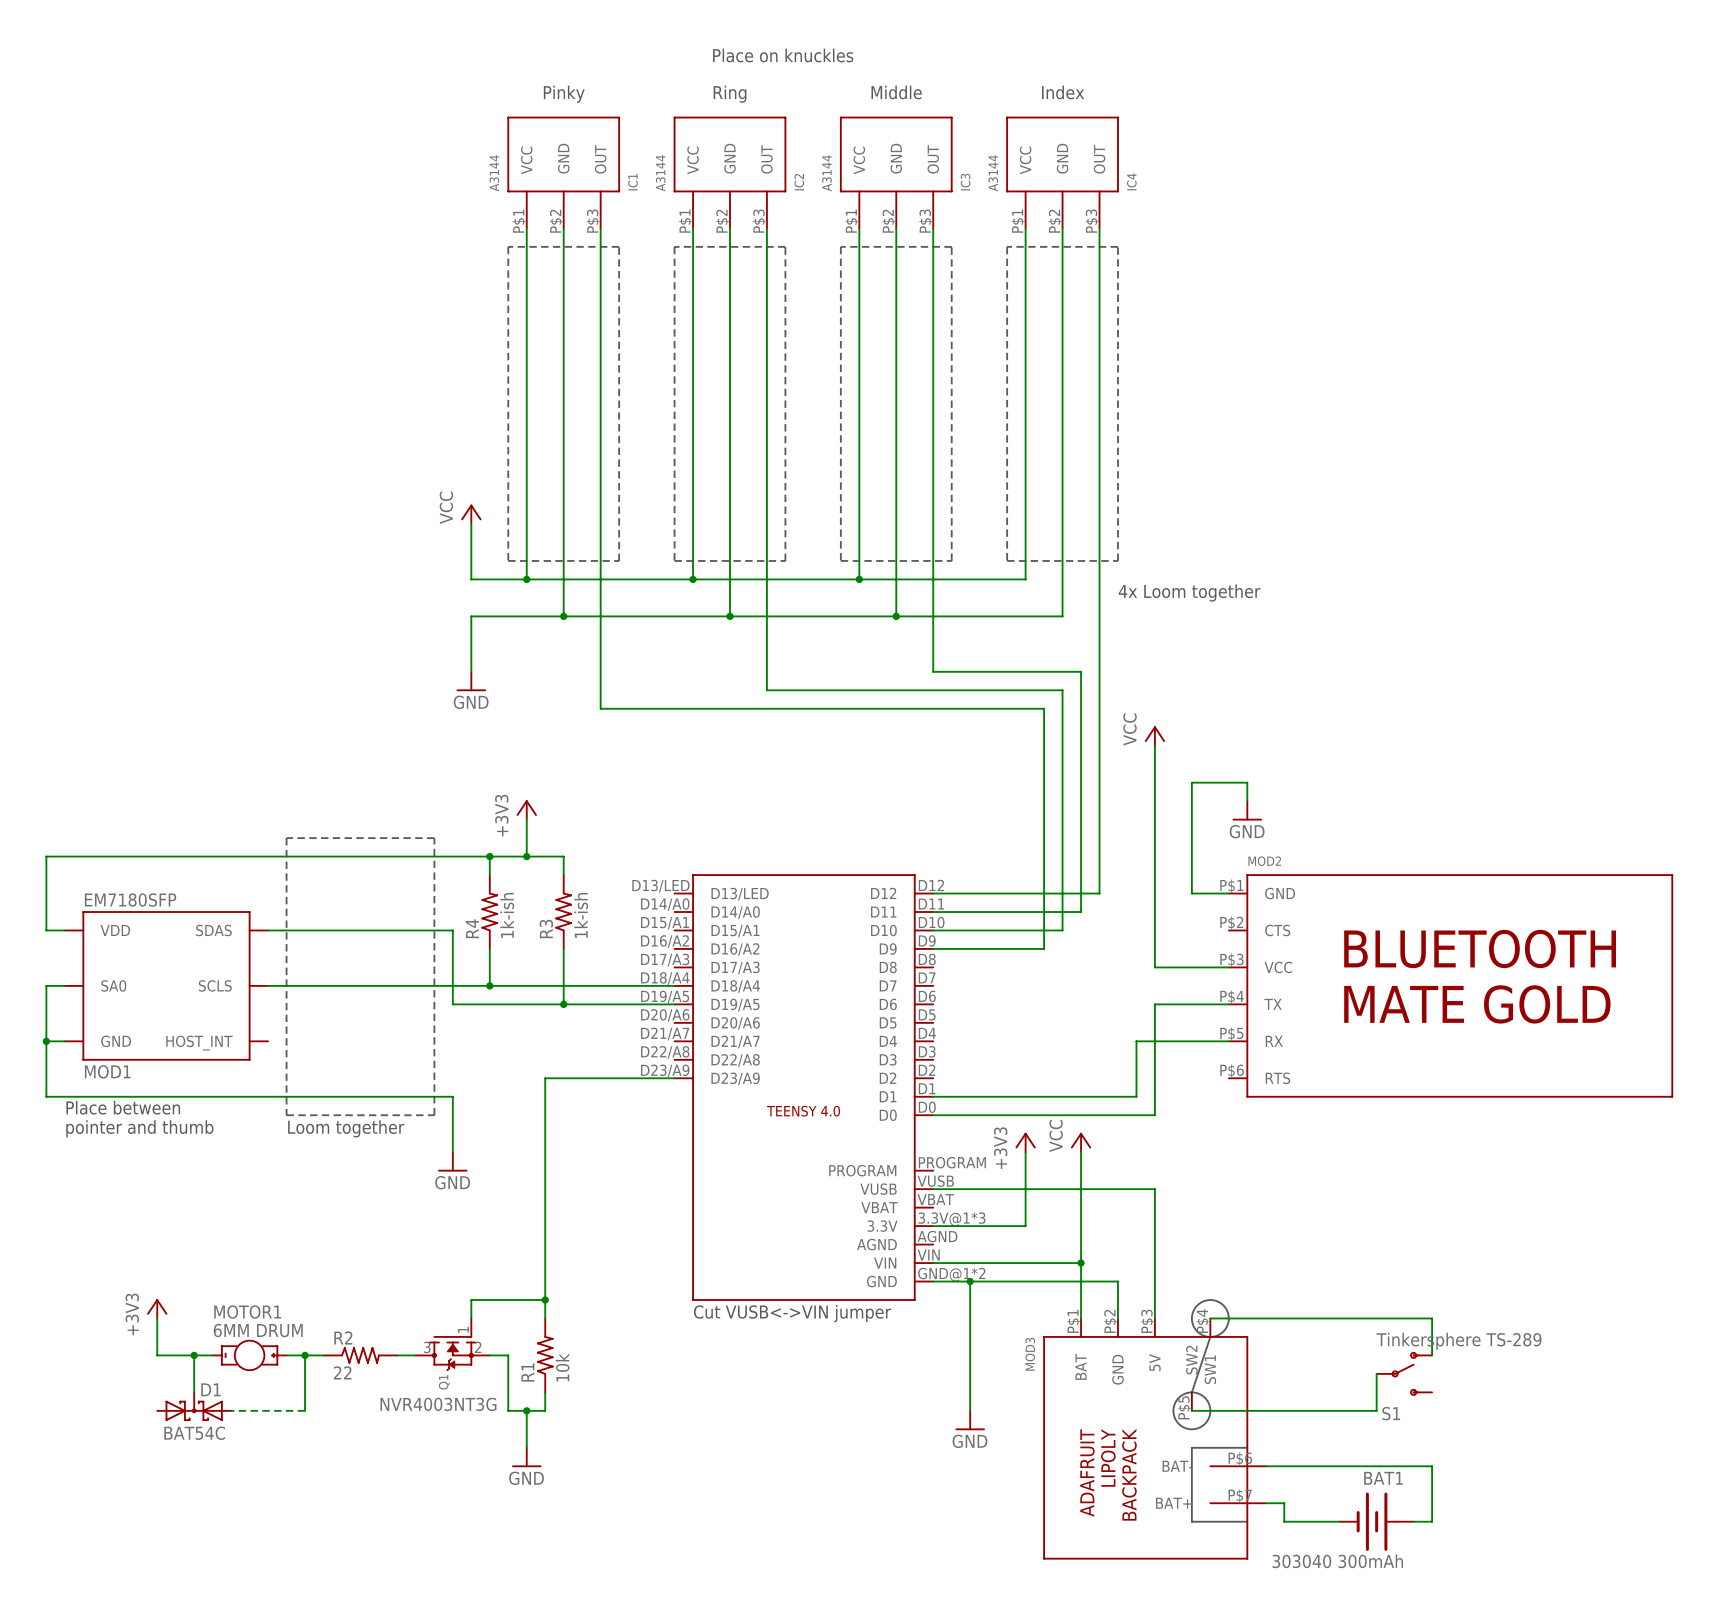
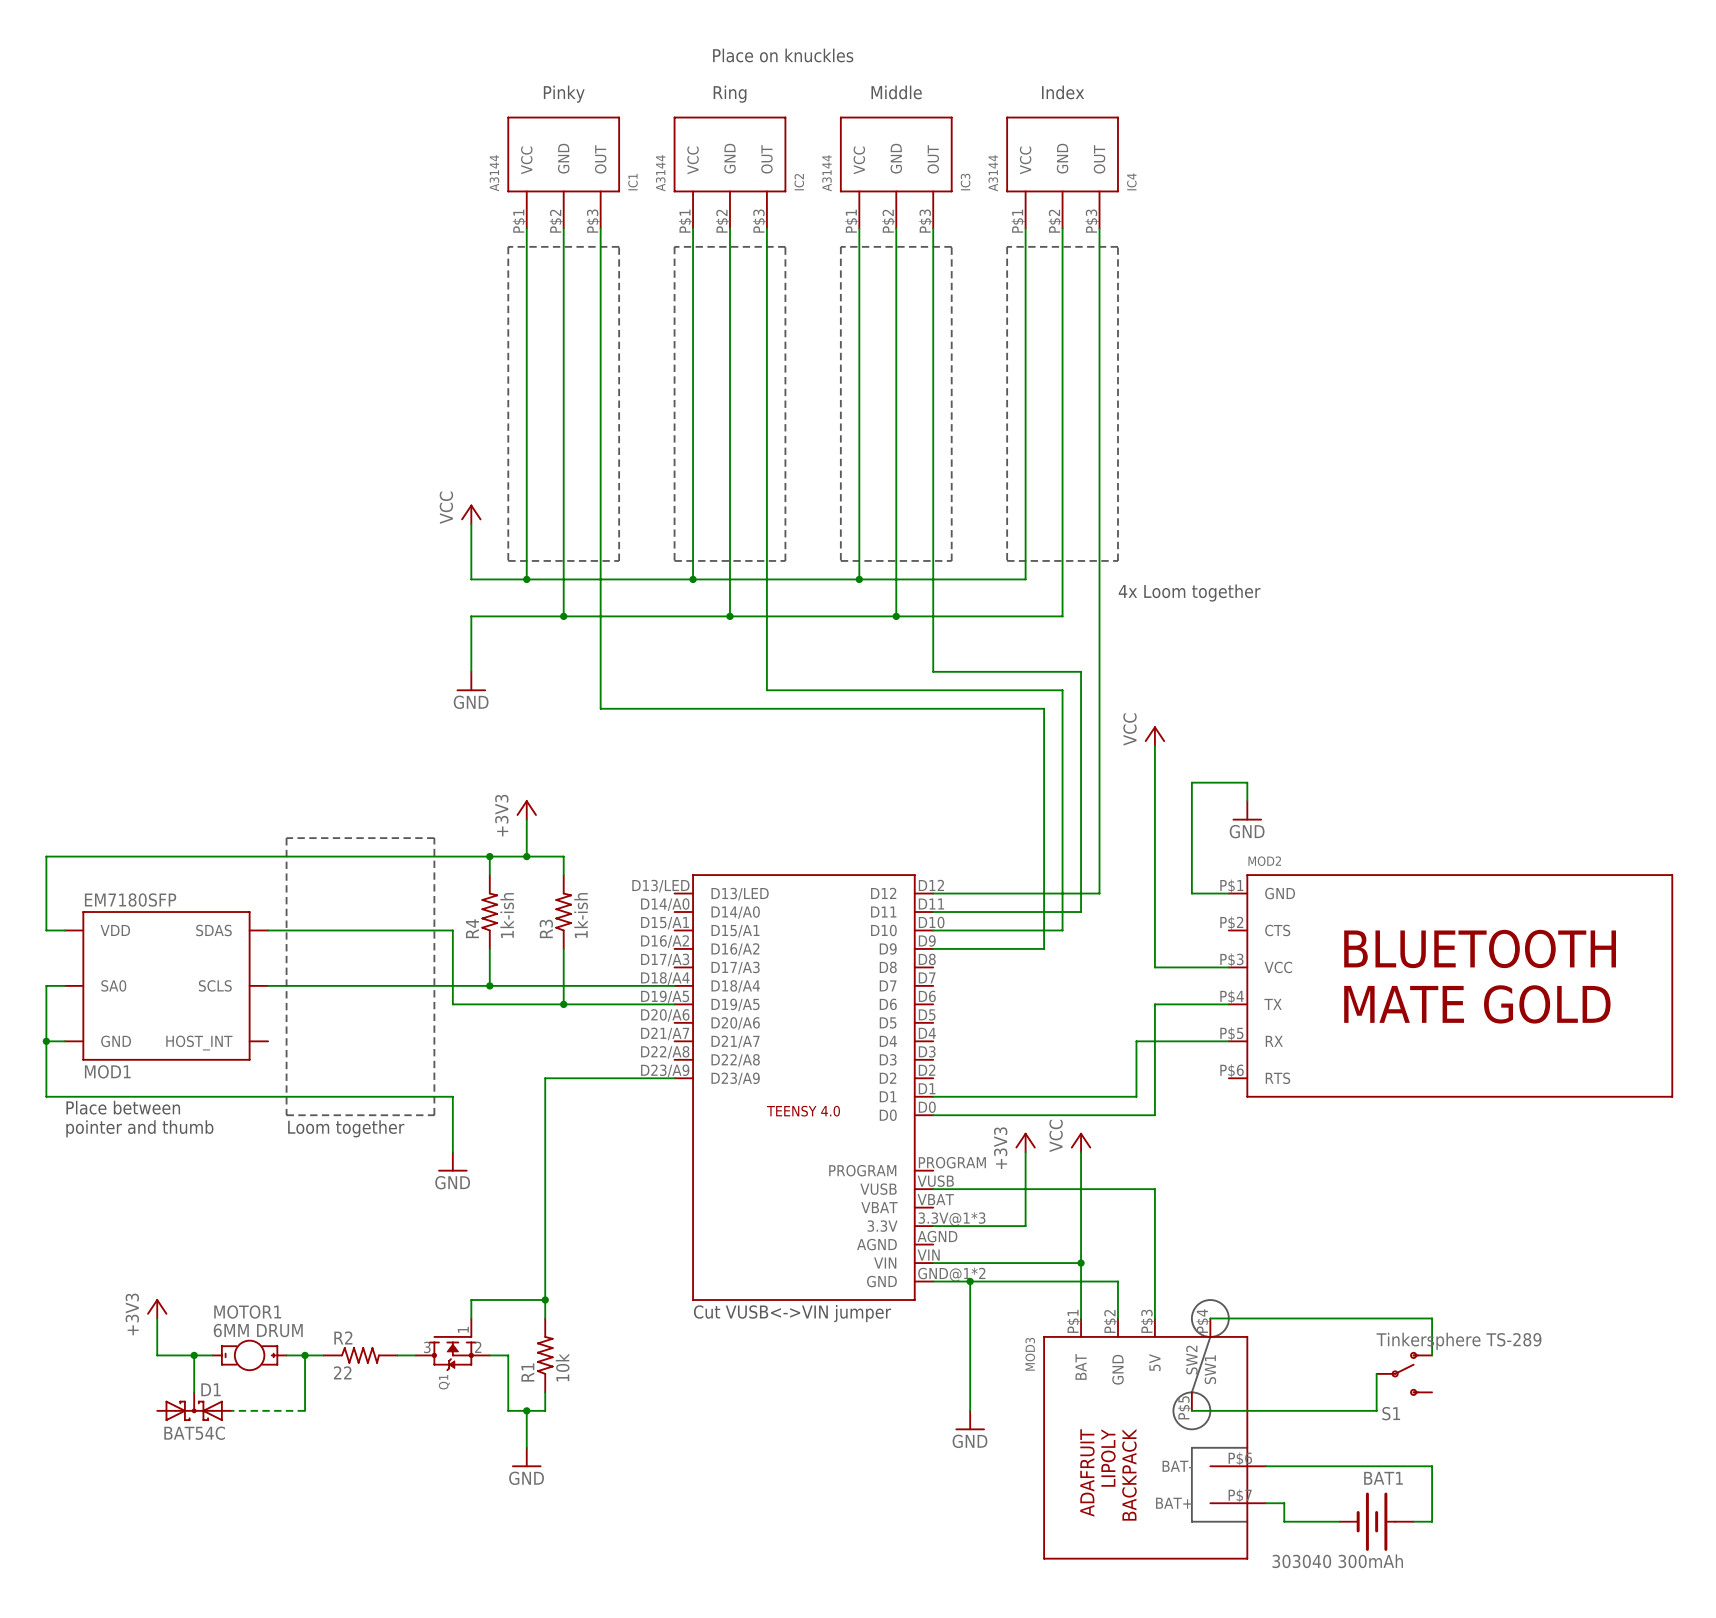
text: NVR4003NT3G (438, 1404) -> none

